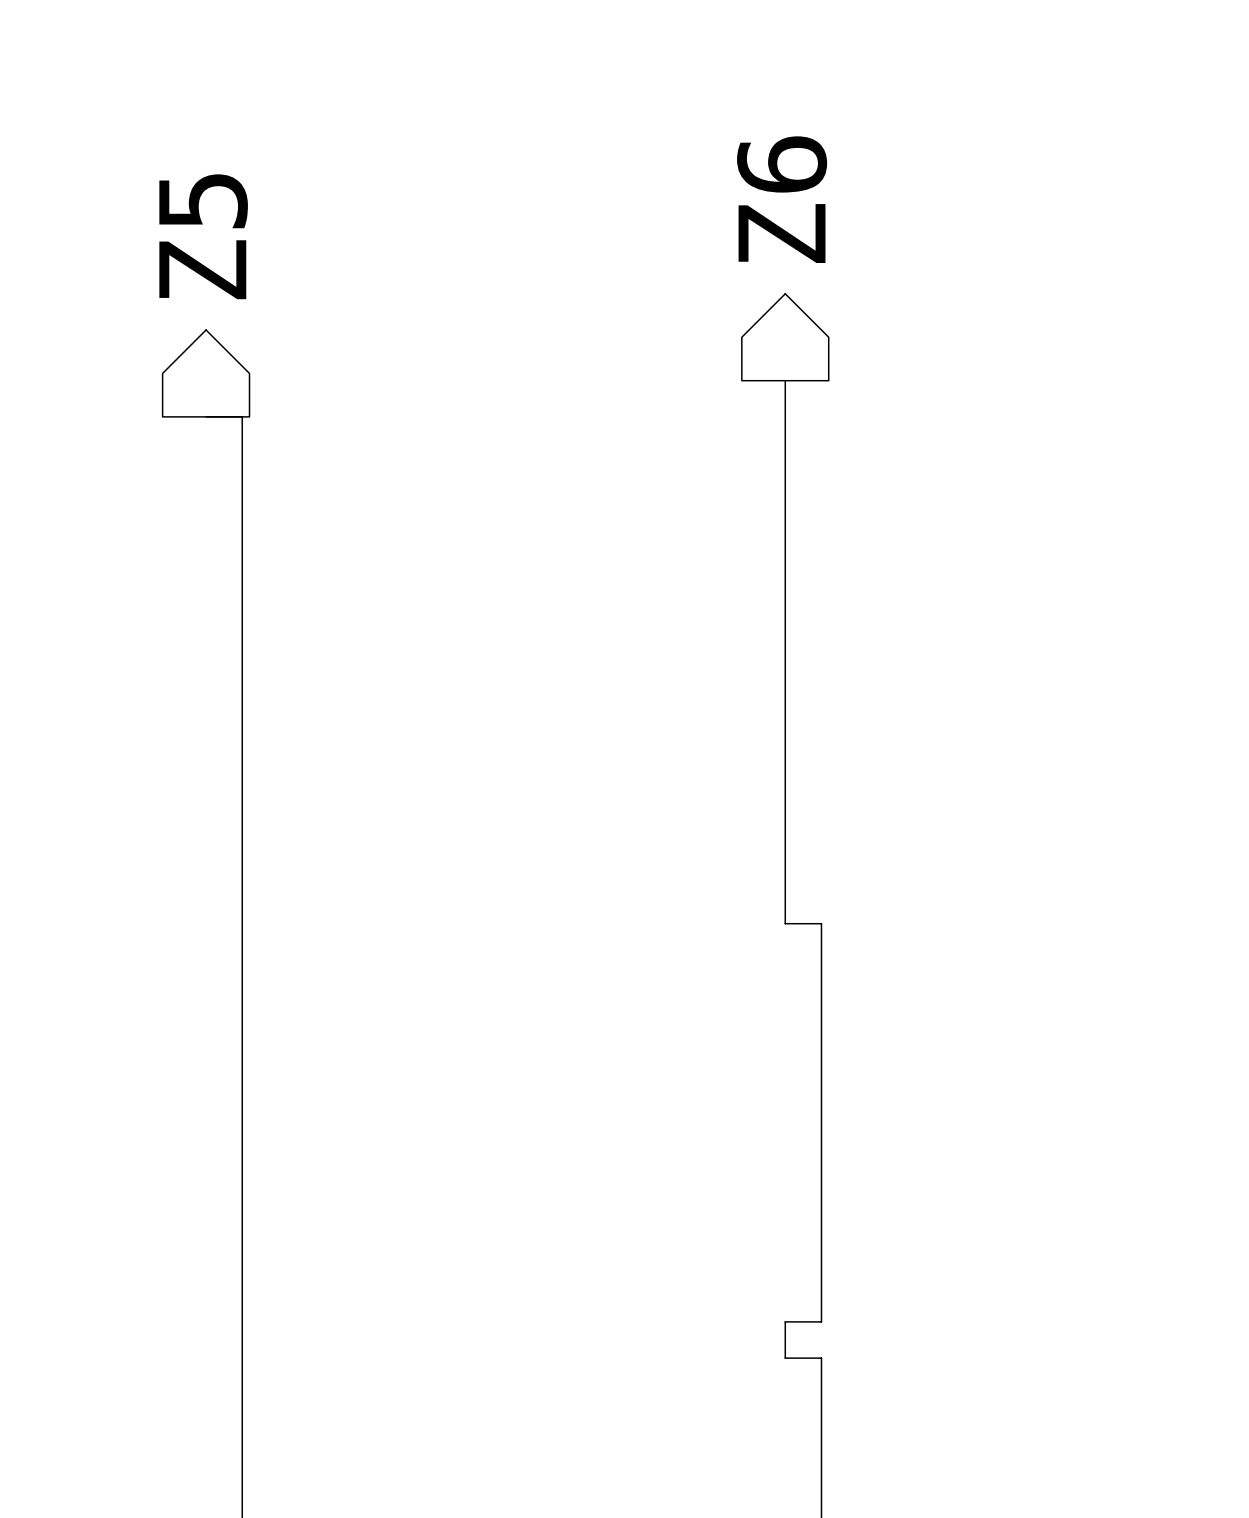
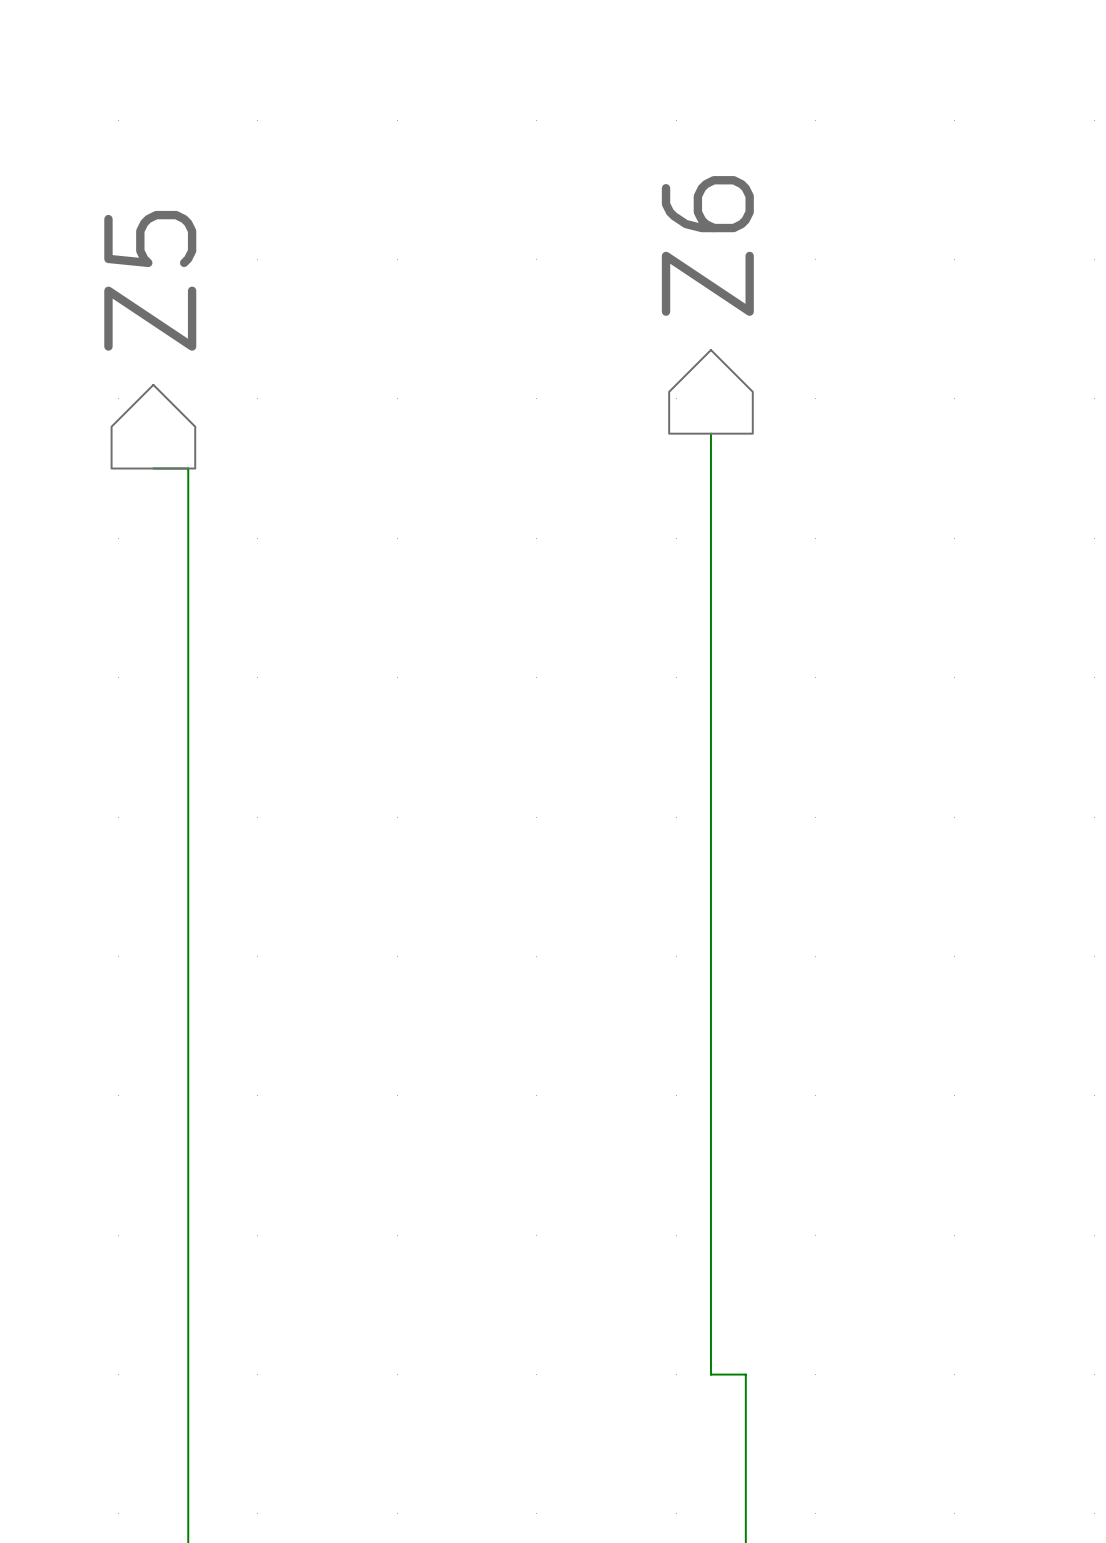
wire: (785, 923) (821, 923) (821, 1321) (785, 1321) -> (710, 956) (710, 1339)

